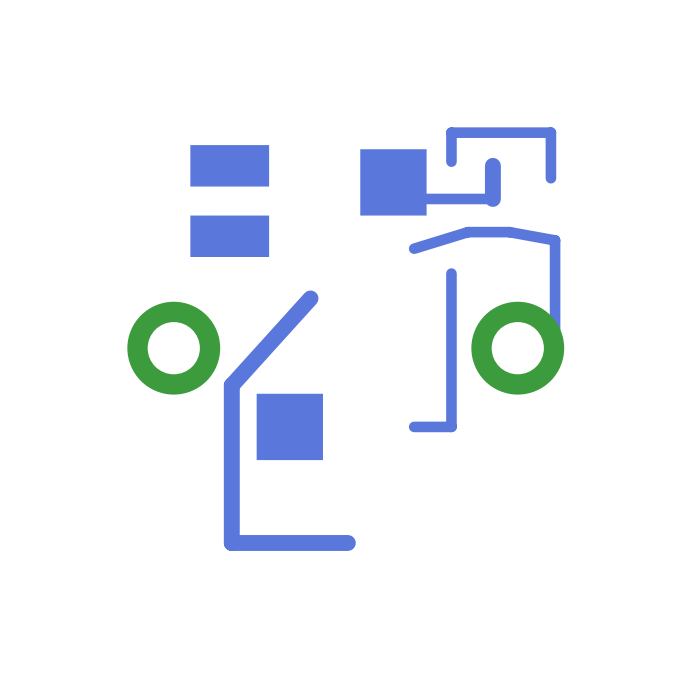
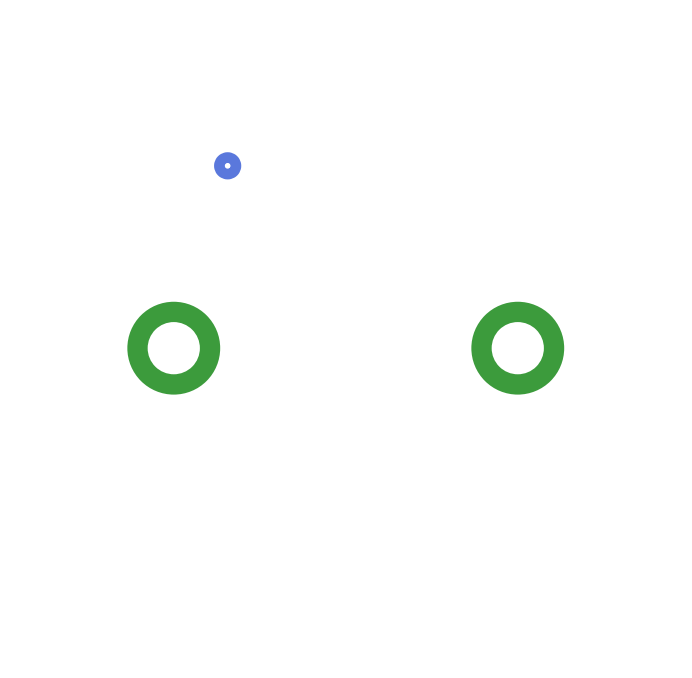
drawing: [190, 145, 270, 257] -> none
drawing: [360, 149, 427, 216] -> none
track: (451, 161) (451, 132) (550, 132) (550, 178) -> none
track: (492, 165) (492, 198) (405, 198) -> none
track: (414, 248) (468, 232) (509, 232) (555, 240) (555, 339) -> none
track: (451, 273) (451, 426) (414, 426) -> none
track: (310, 298) (231, 385) (231, 542) (347, 542) -> none
drawing: [256, 393, 323, 461] -> none

